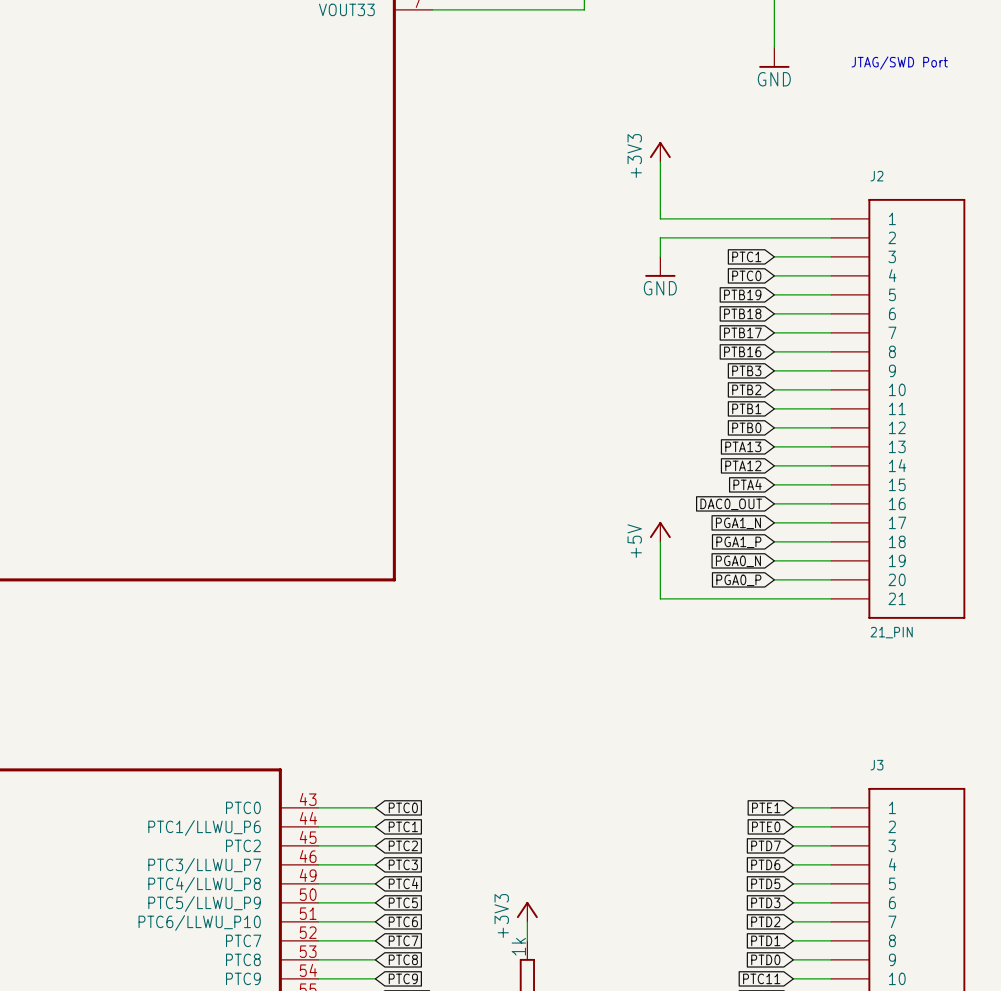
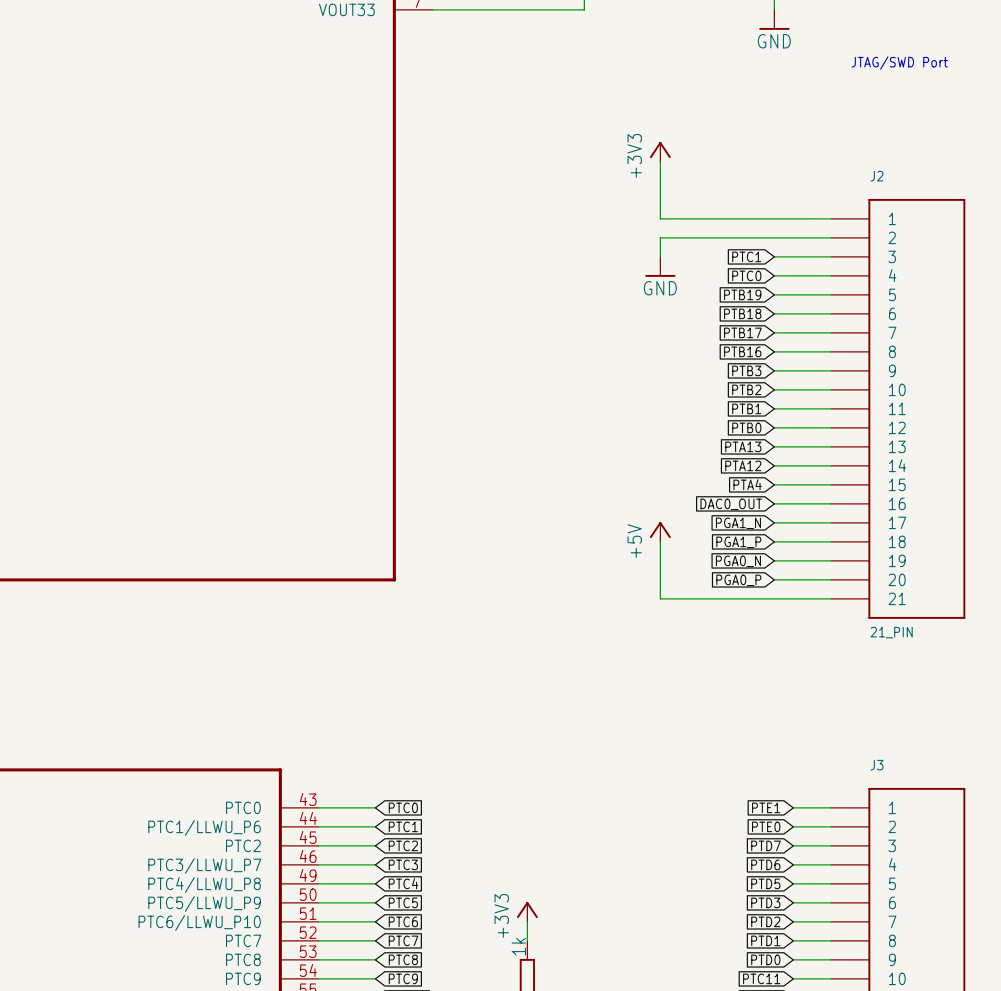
power symbol position: GND (774, 57) -> GND (774, 19)

